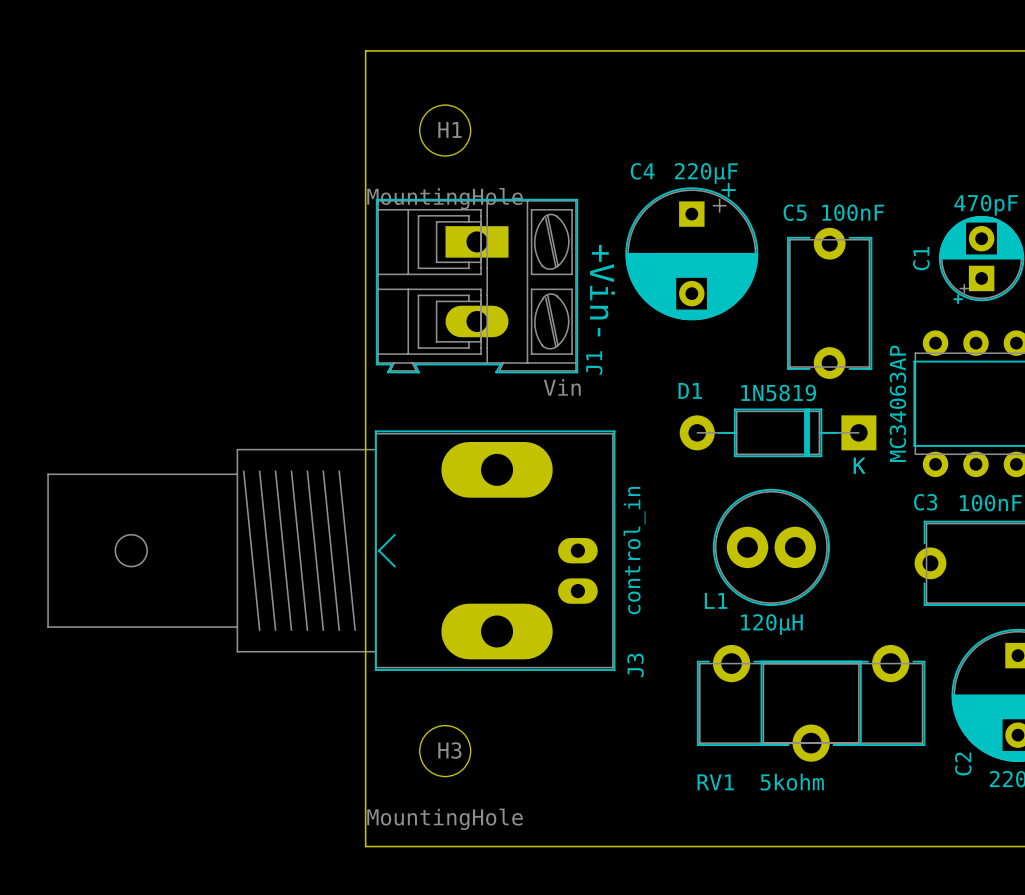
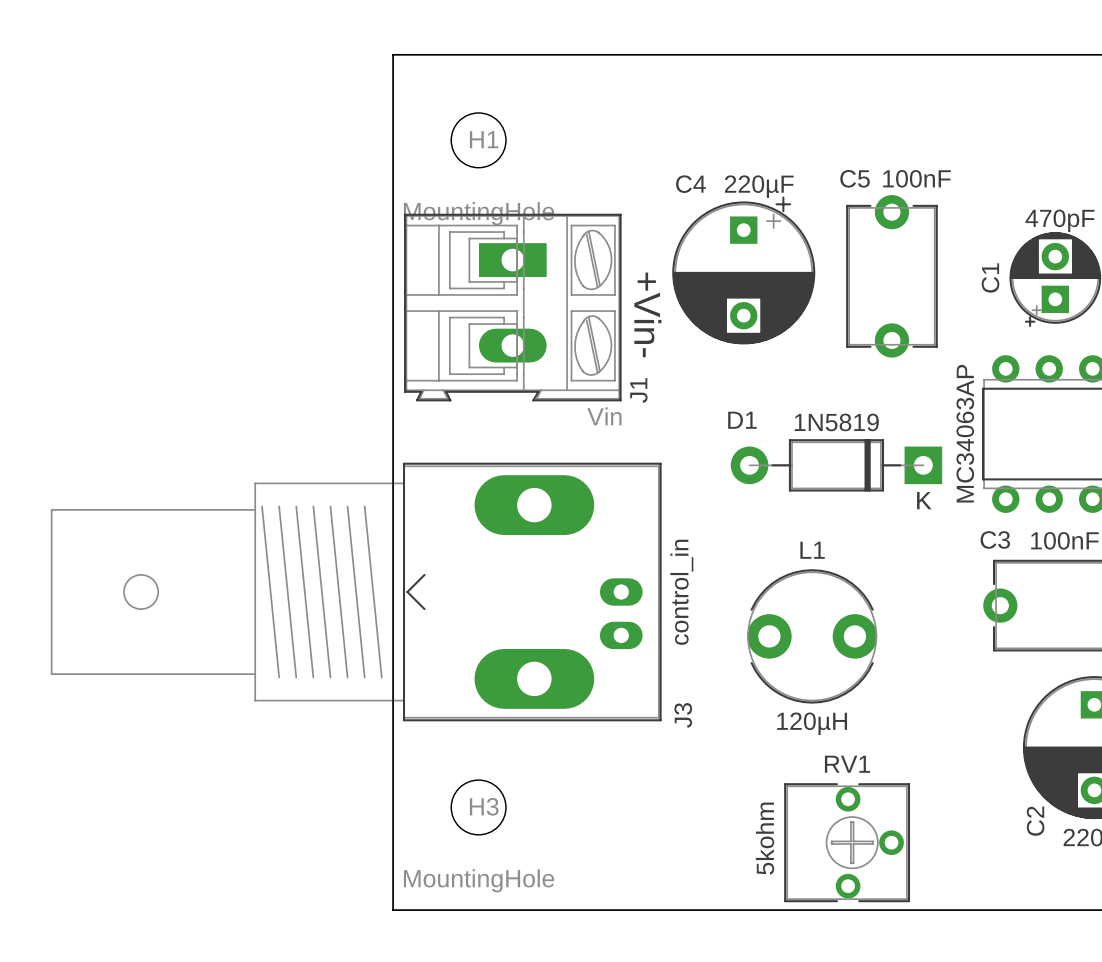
C5 position: (829, 303) -> (891, 276)
L1 footprint: [712, 488, 830, 606] -> [747, 569, 878, 704]
L1 name position: L1 (716, 600) -> L1 (812, 550)
RV1 footprint: [696, 644, 926, 762] -> [784, 783, 911, 903]
RV1 name position: RV1 (715, 782) -> RV1 (847, 764)
RV1 value position: 5kohm (792, 782) -> 5kohm (765, 838)

